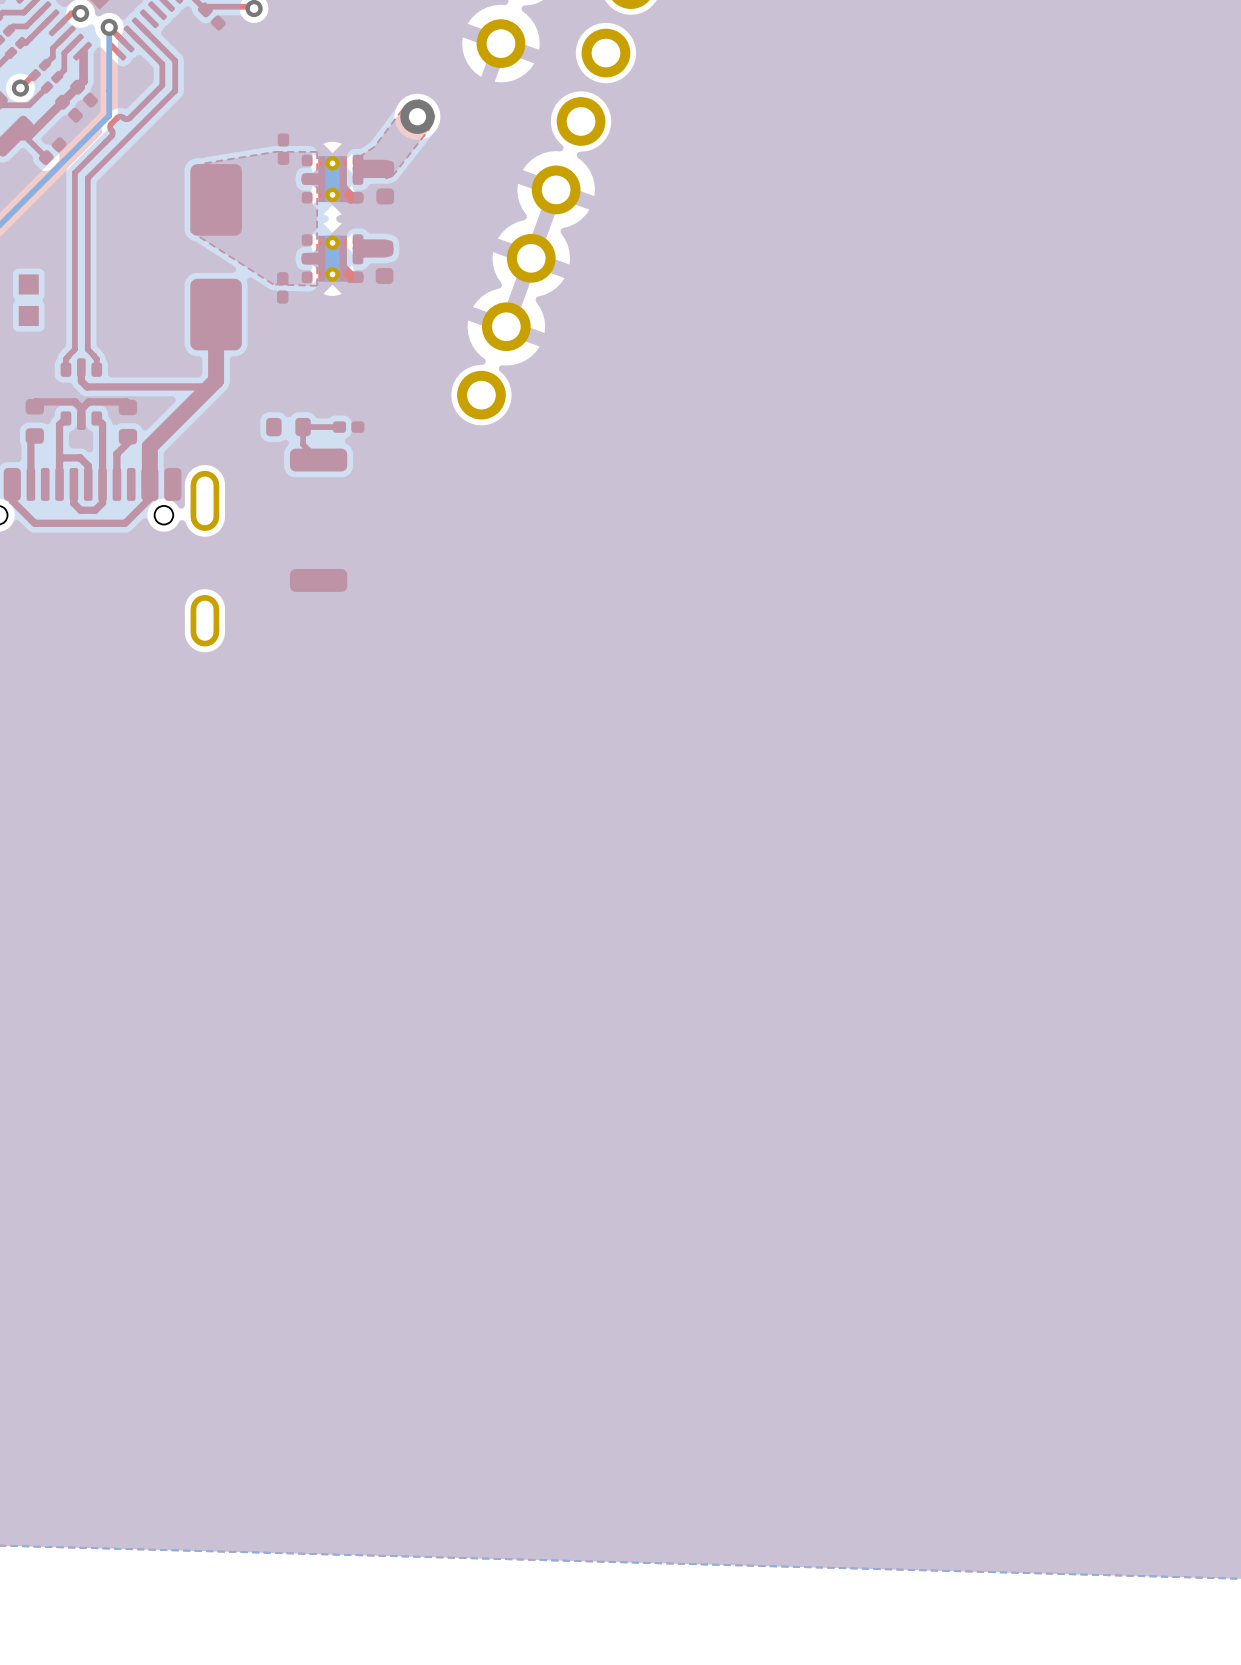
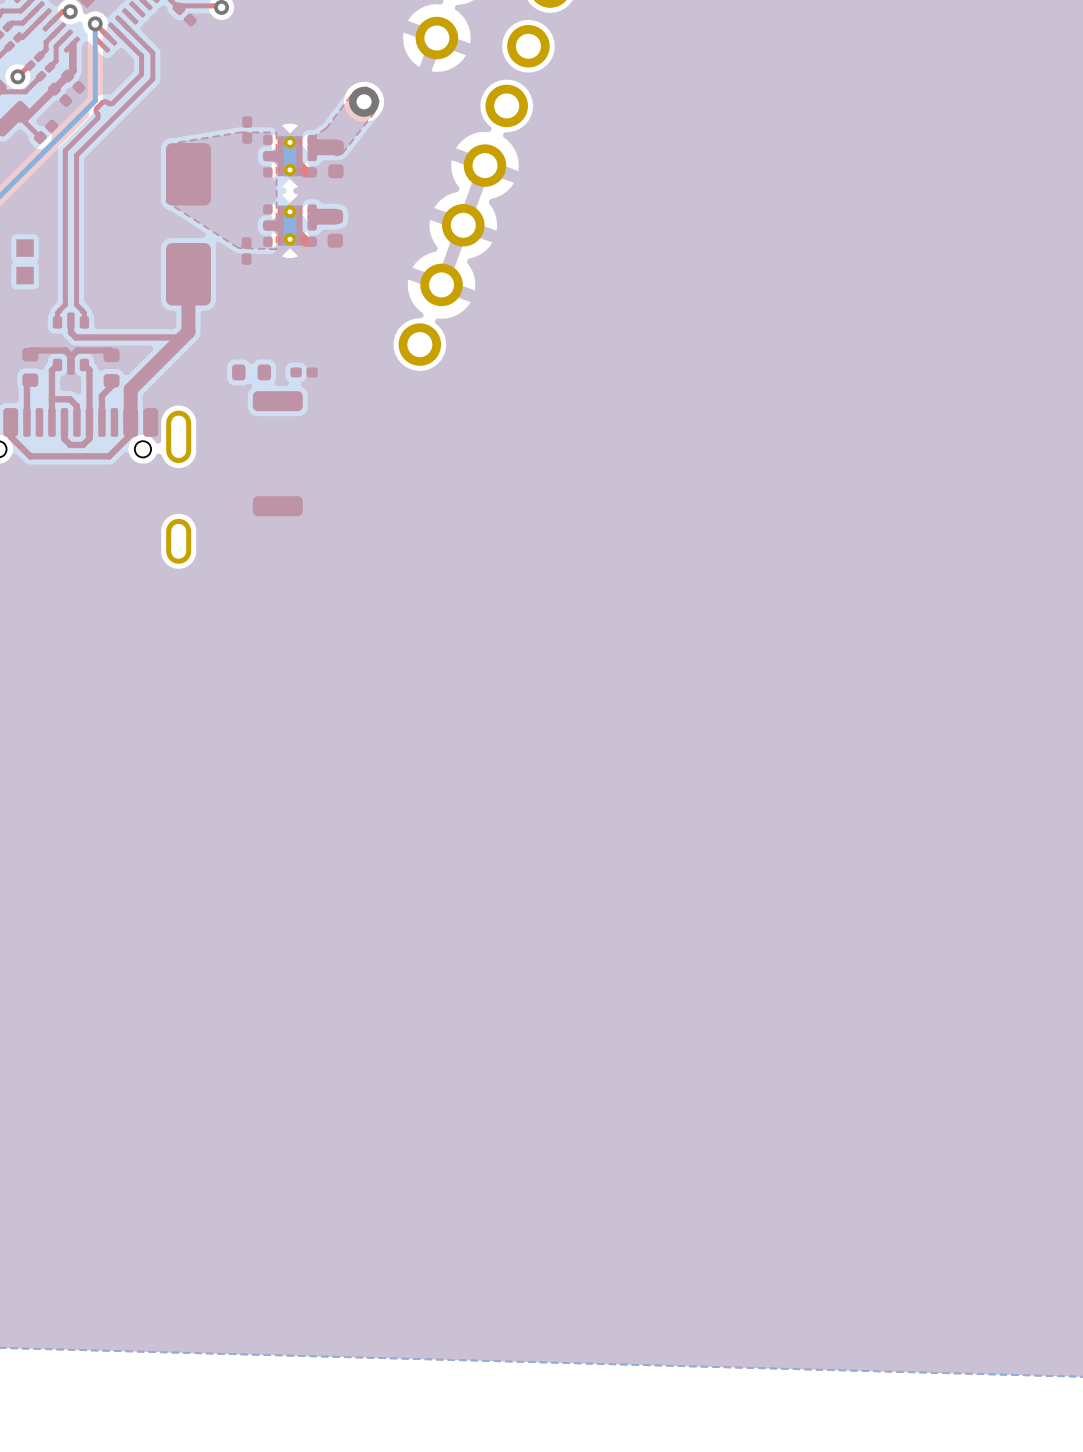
top track: (339, 427) (303, 427) (303, 444) (318, 460) -> none

